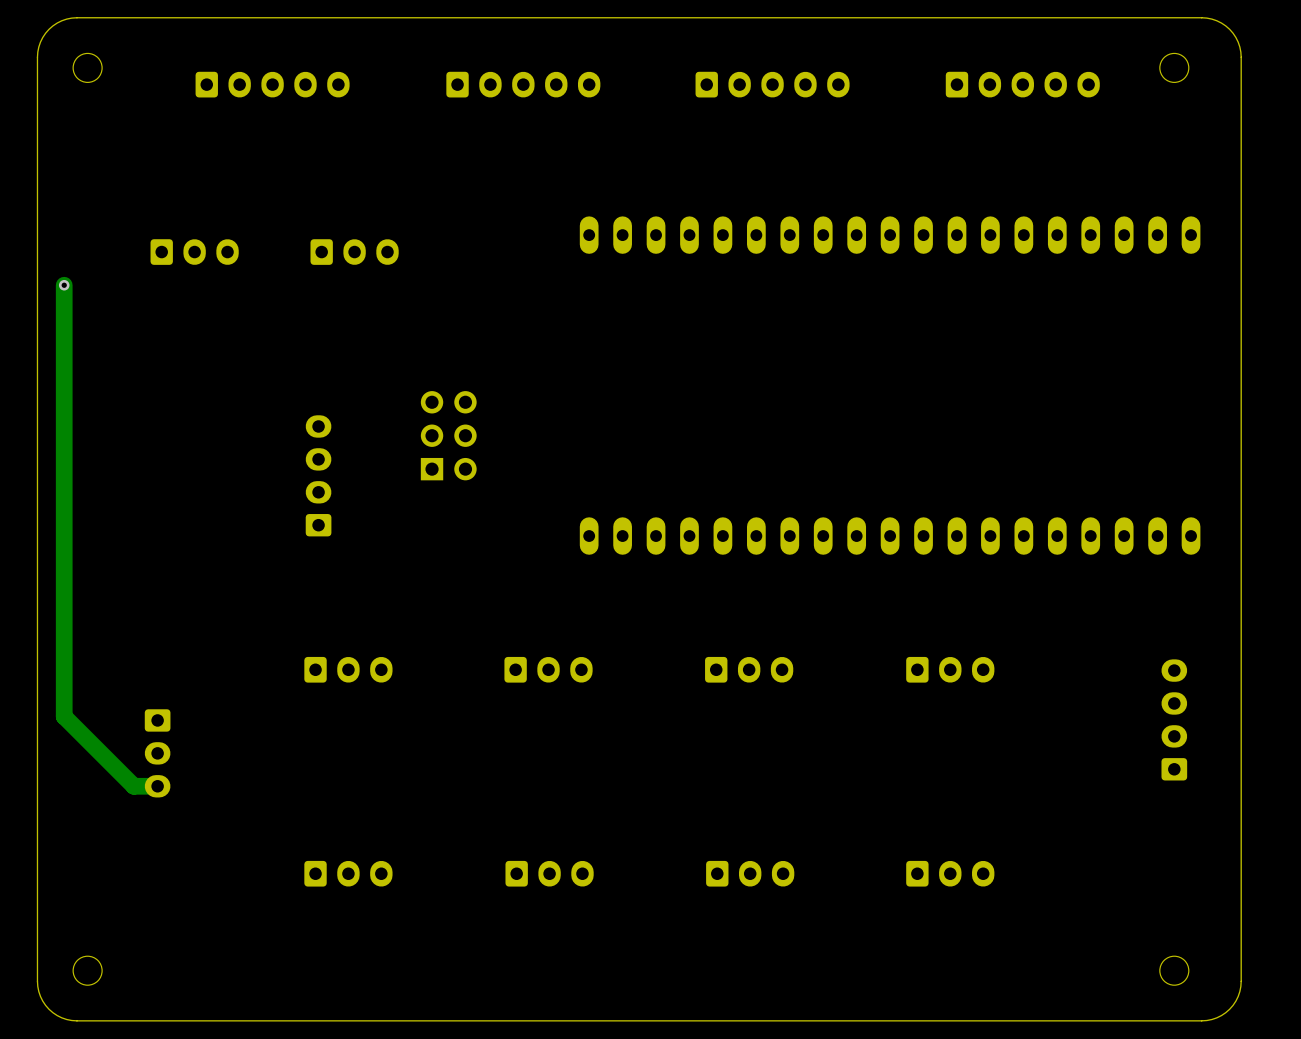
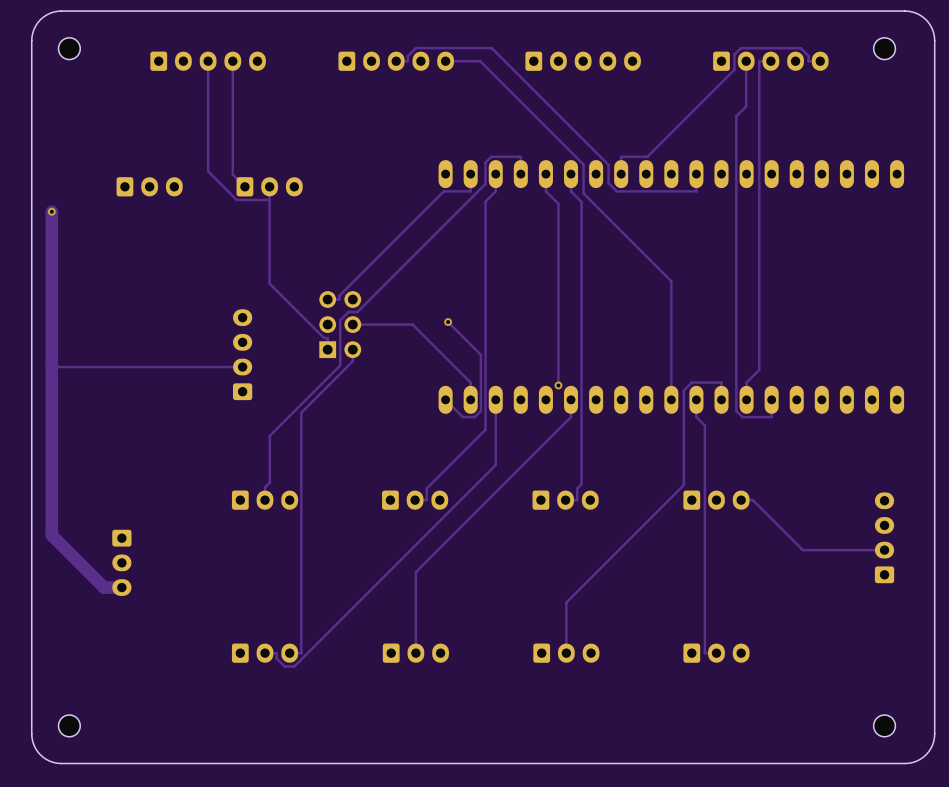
track: none -> (208, 61) (208, 171) (236, 200) (269, 200)
track: none -> (232, 61) (232, 174) (244, 186)
track: none -> (396, 61) (407, 61) (407, 56) (415, 48) (491, 48) (608, 165) (608, 183) (616, 191) (696, 191) (696, 174)
track: none -> (445, 61) (480, 61) (583, 164) (583, 193) (671, 281) (671, 399)
track: none -> (746, 61) (746, 106) (736, 116) (736, 411) (742, 417) (771, 417) (771, 399)
track: none -> (770, 61) (759, 61) (759, 369) (746, 382) (746, 399)
track: none -> (820, 61) (808, 61) (808, 56) (800, 48) (740, 48) (734, 54) (734, 69) (647, 156) (621, 156) (621, 174)
track: none -> (470, 174) (470, 191) (443, 191) (339, 295) (339, 299) (327, 299)
track: none -> (495, 174) (495, 191) (485, 201) (485, 429) (426, 488) (426, 500) (415, 500)
track: none -> (520, 174) (520, 156) (491, 156) (485, 162) (485, 183) (357, 312) (348, 312) (340, 320) (340, 365) (269, 435) (269, 482) (265, 487) (265, 500)
track: none -> (545, 174) (545, 191) (558, 203) (558, 385)
track: none -> (571, 174) (571, 191) (581, 201) (581, 484) (577, 488) (577, 500) (565, 500)
track: none -> (269, 186) (269, 283) (324, 338) (327, 338) (327, 349)
track: none -> (448, 322) (480, 354) (480, 411) (474, 417) (462, 417) (445, 399)
via: none -> (448, 322)
track: none -> (352, 324) (412, 324) (470, 382) (470, 399)
track: none -> (352, 349) (352, 361) (301, 412) (301, 653) (289, 653)
track: none -> (242, 367) (51, 367)
via: none -> (558, 385)
track: none -> (495, 399) (495, 465) (294, 666) (284, 666) (276, 658) (276, 653) (265, 653)
track: none -> (571, 399) (571, 417) (415, 572) (415, 653)
track: none -> (696, 399) (696, 417) (704, 425) (704, 653) (716, 653)
track: none -> (721, 399) (721, 382) (691, 382) (683, 390) (683, 485) (566, 602) (566, 653)
track: none -> (741, 500) (752, 500) (802, 550) (884, 550)

